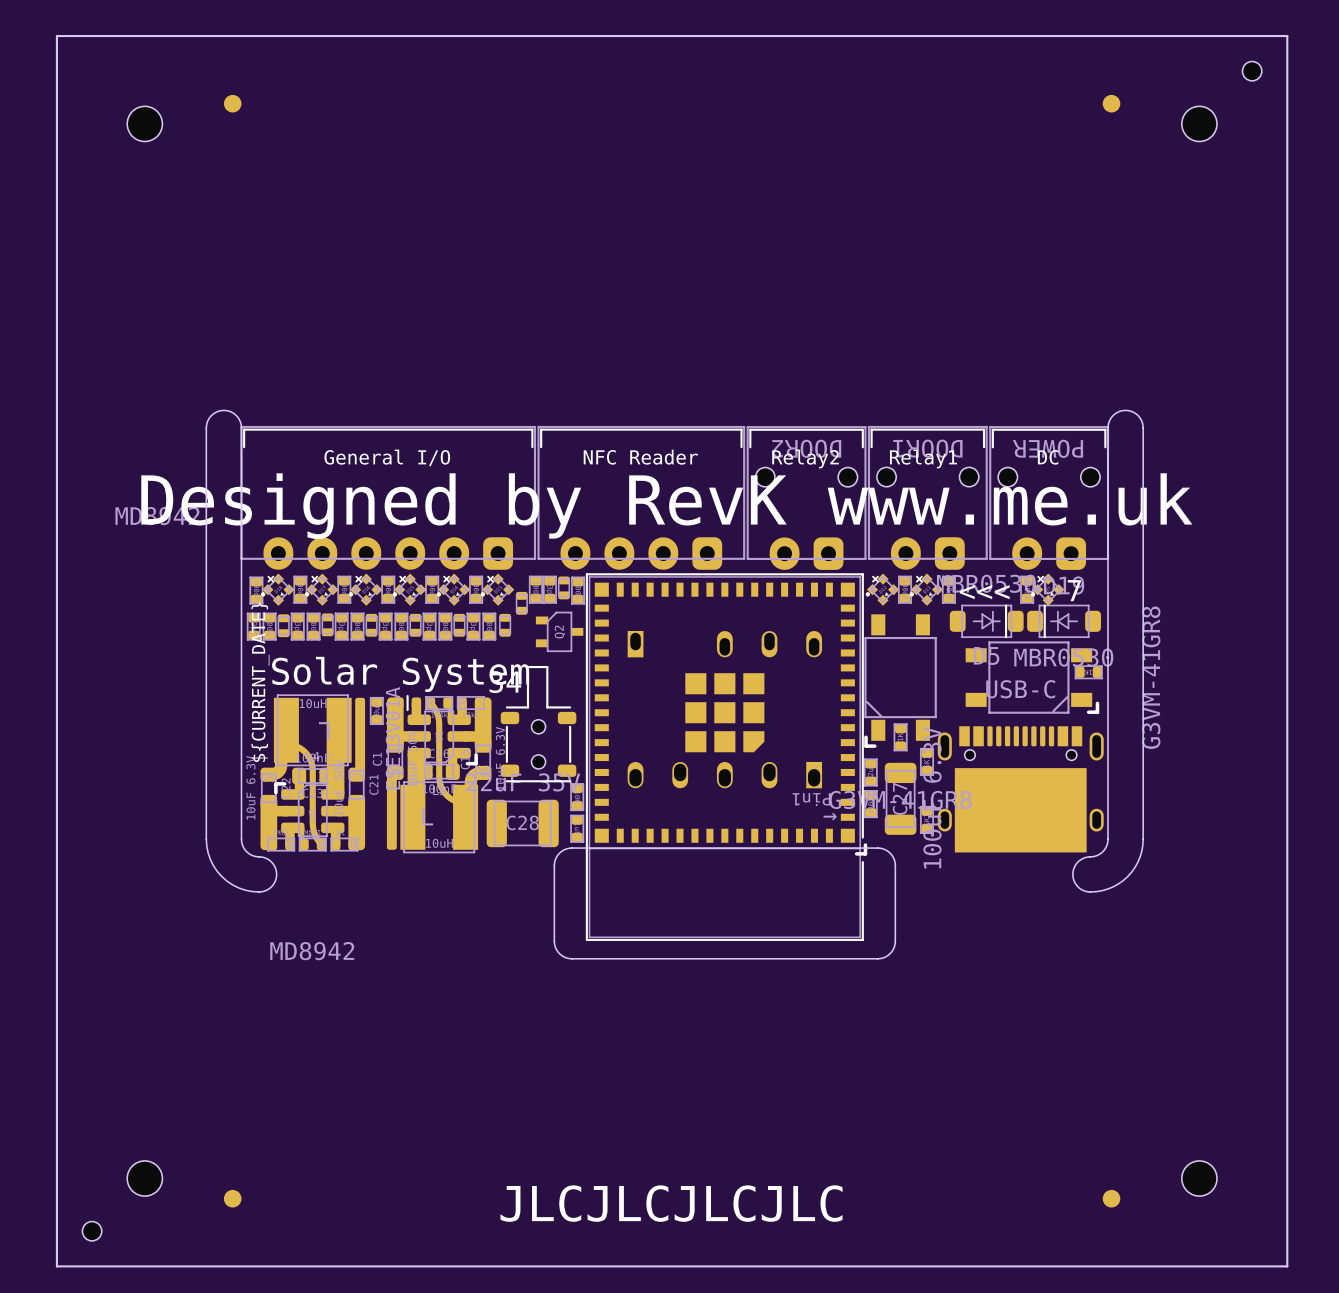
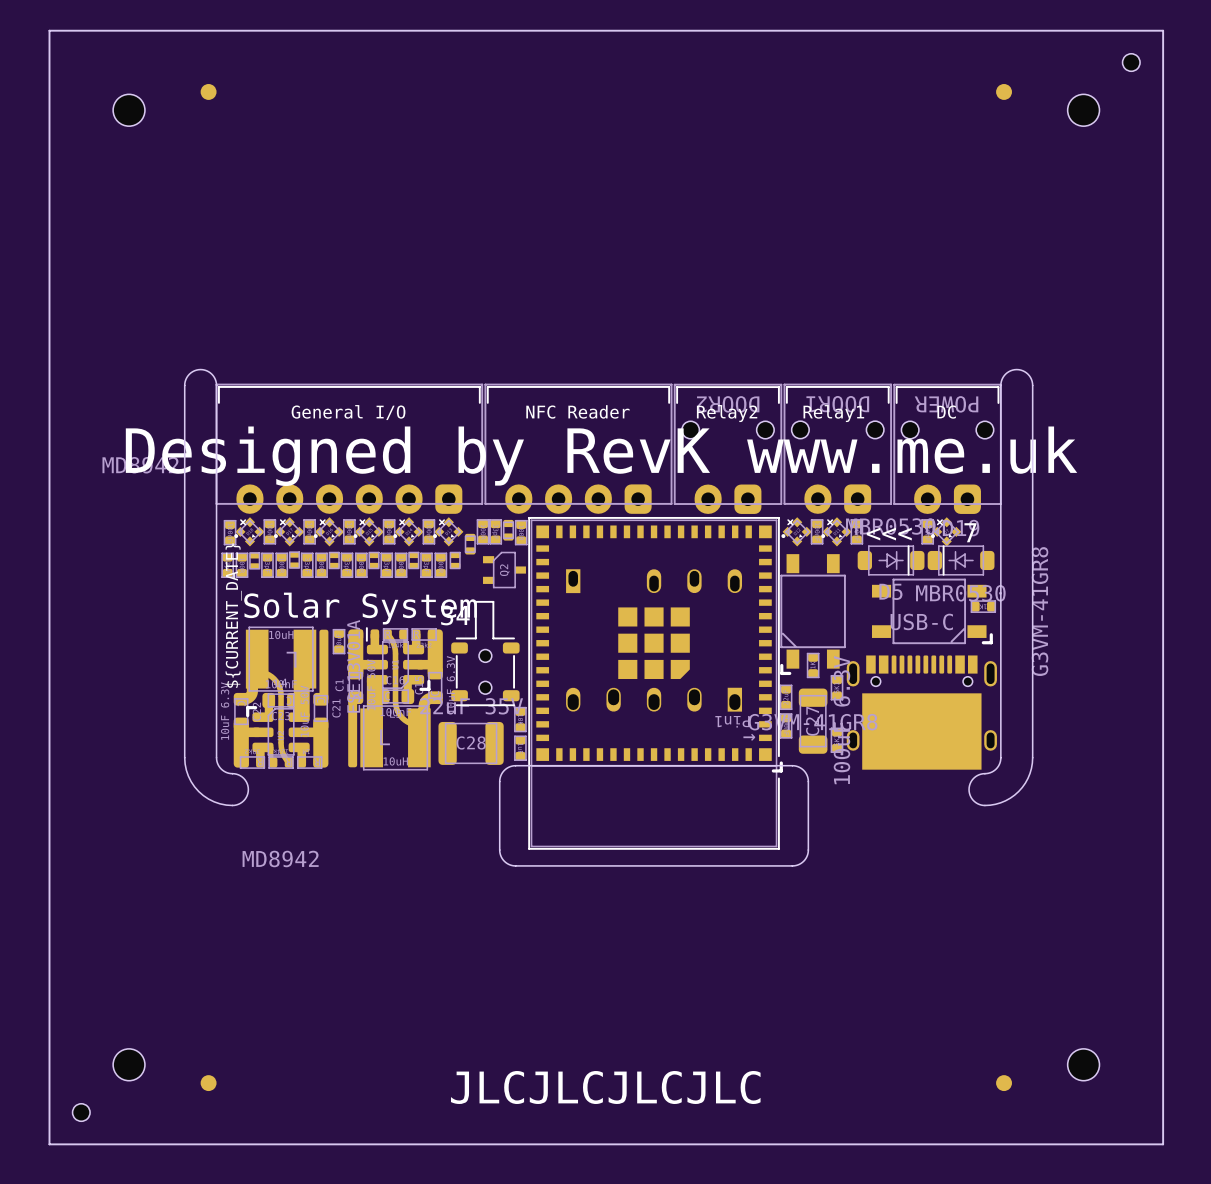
part footprint: [321, 613, 334, 637] -> [289, 551, 300, 569]
part footprint: [365, 613, 378, 637] -> [329, 552, 340, 569]
part footprint: [409, 613, 422, 637] -> [368, 552, 380, 569]
part footprint: [453, 613, 466, 637] -> [408, 552, 419, 569]
part footprint: [499, 613, 511, 637] -> [450, 552, 461, 569]
part footprint: [277, 614, 290, 638] -> [249, 552, 260, 570]

